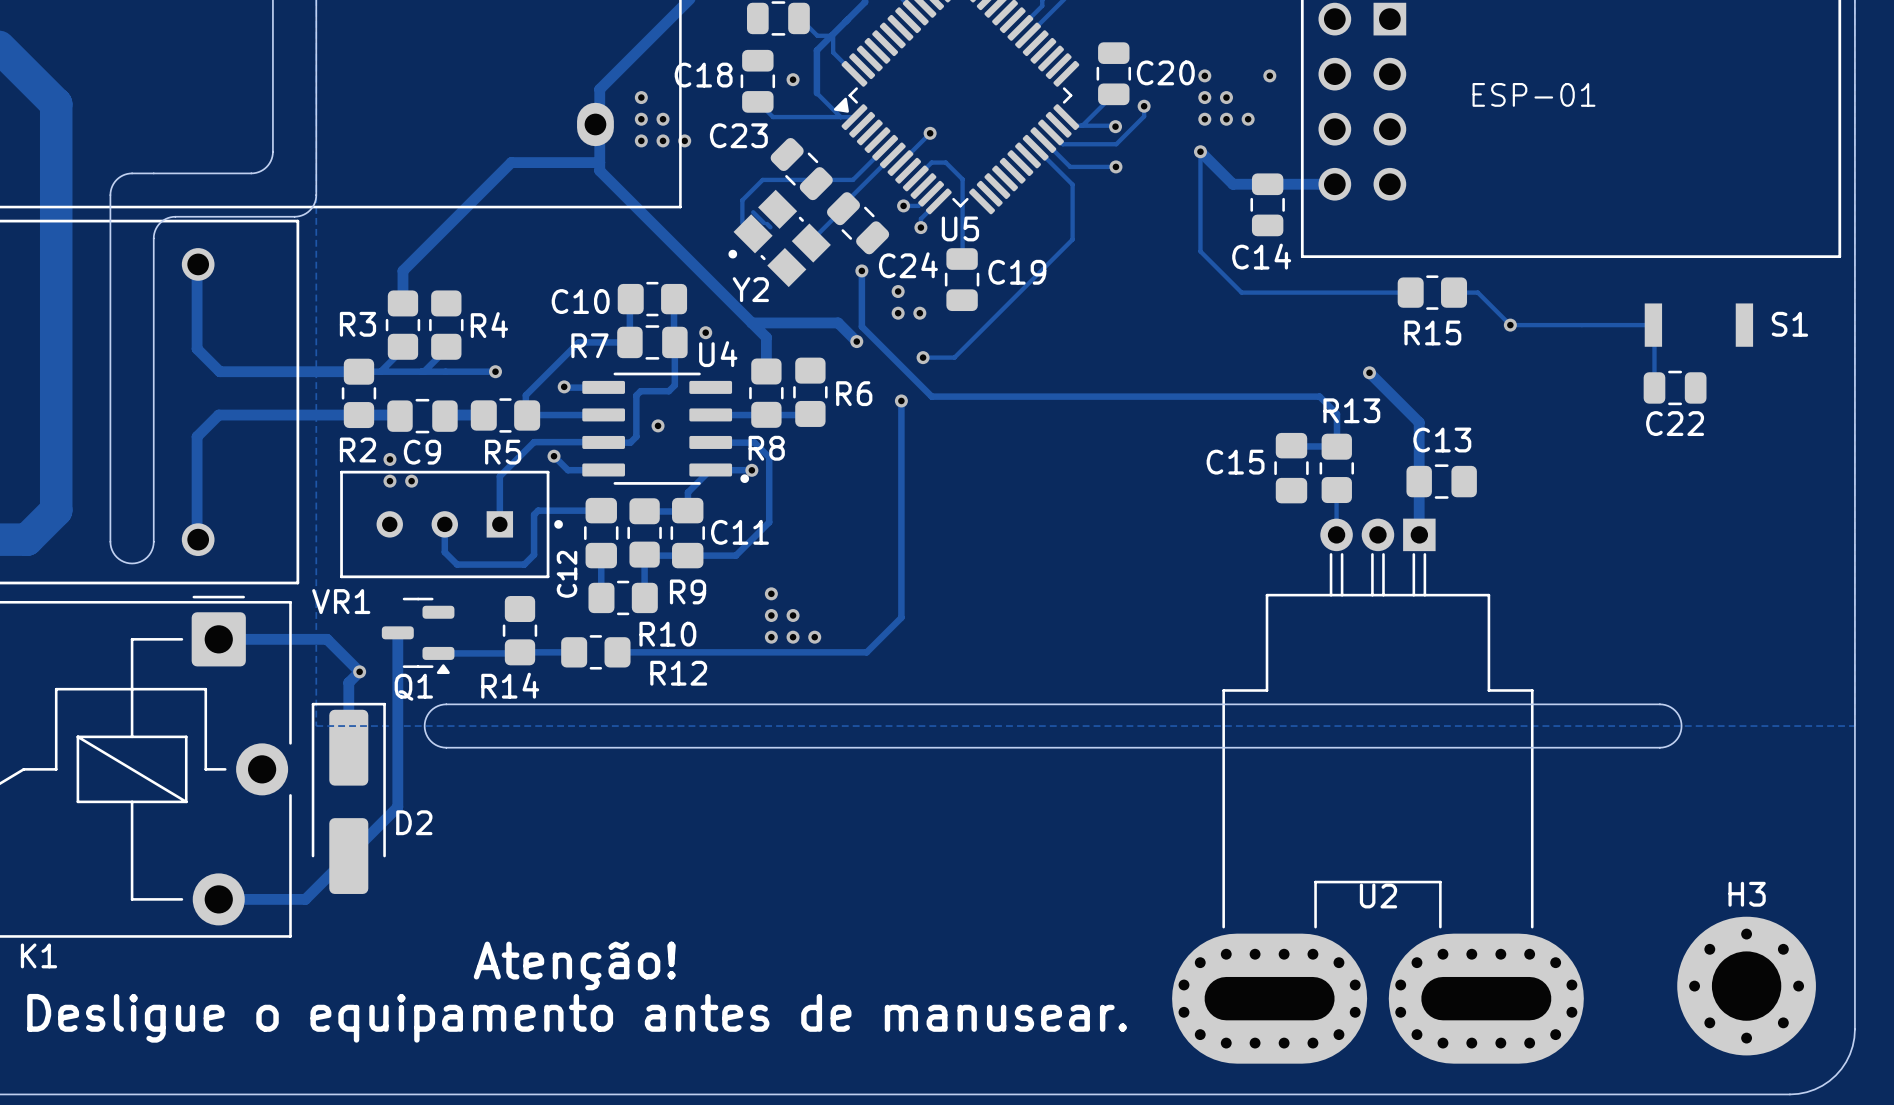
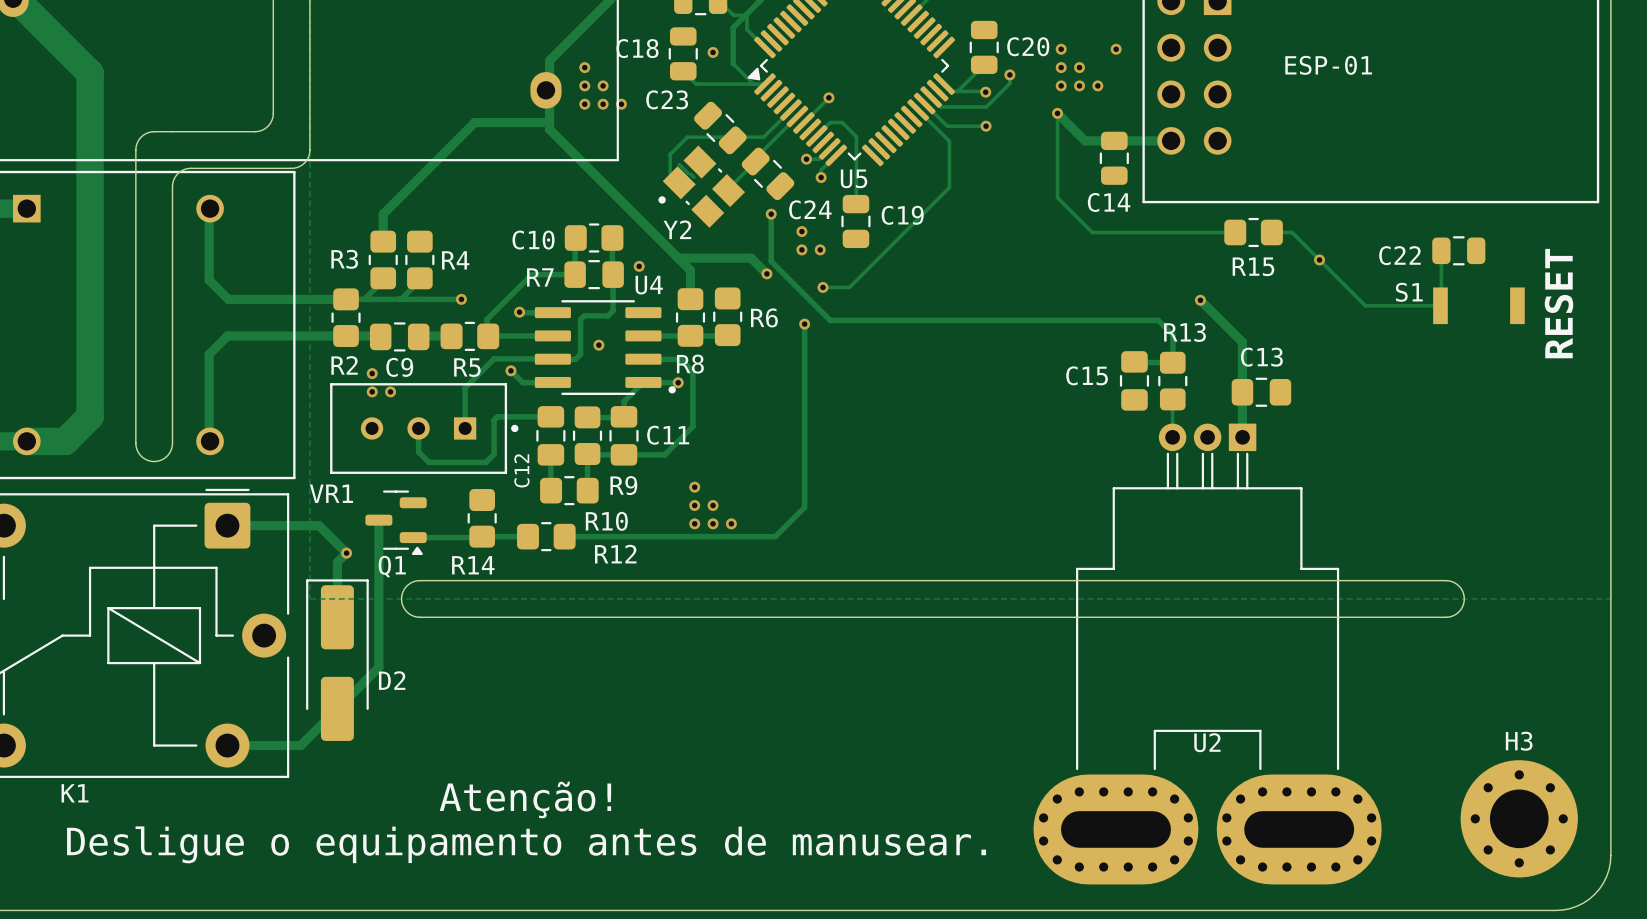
S1 name position: S1 (1789, 324) -> S1 (1409, 292)
track: (1510, 325) (1654, 326) -> (1319, 259) (1365, 305) (1441, 304)
S1 position: (1698, 325) -> (1478, 305)
text: none -> RESET (1558, 303)
C22 position: (1675, 387) -> (1458, 250)
C22 name position: C22 (1675, 423) -> C22 (1399, 255)

